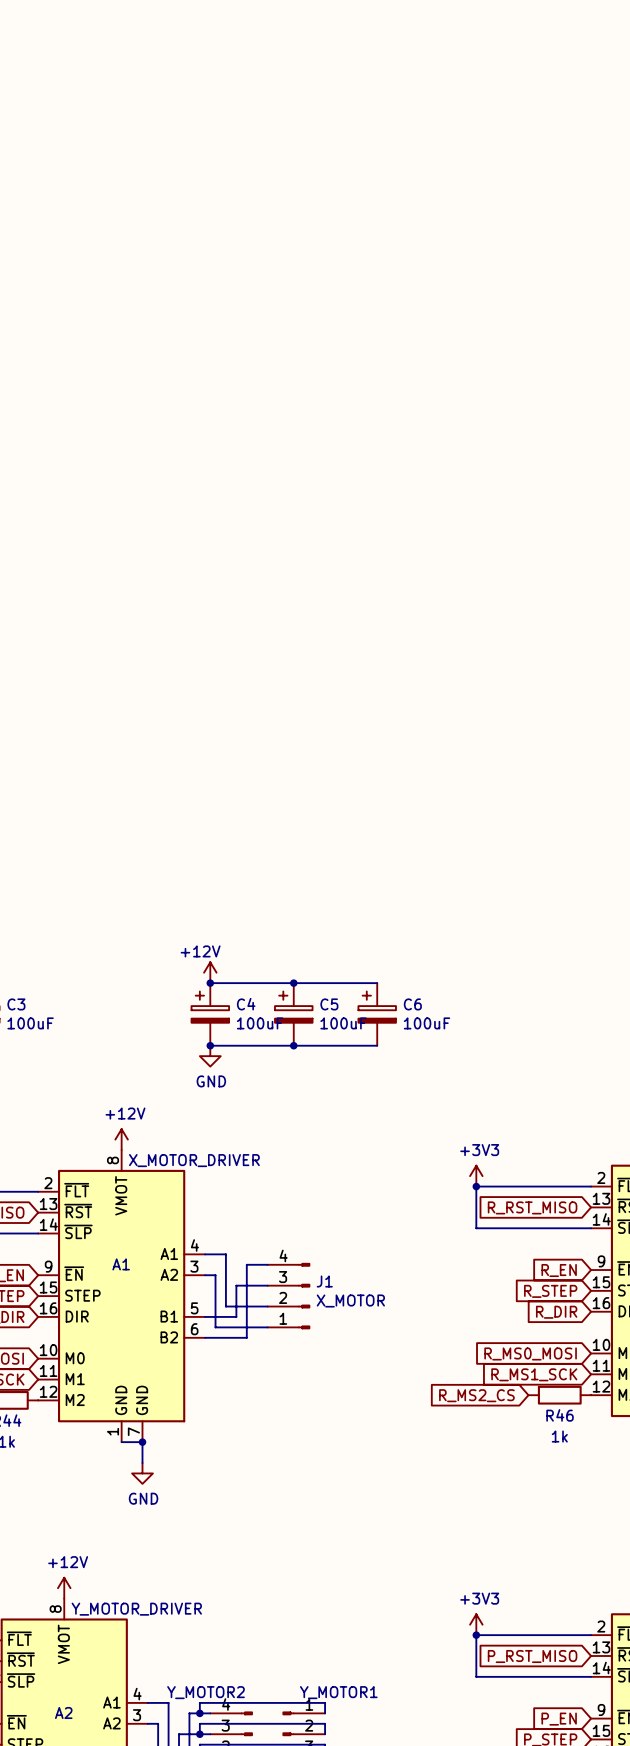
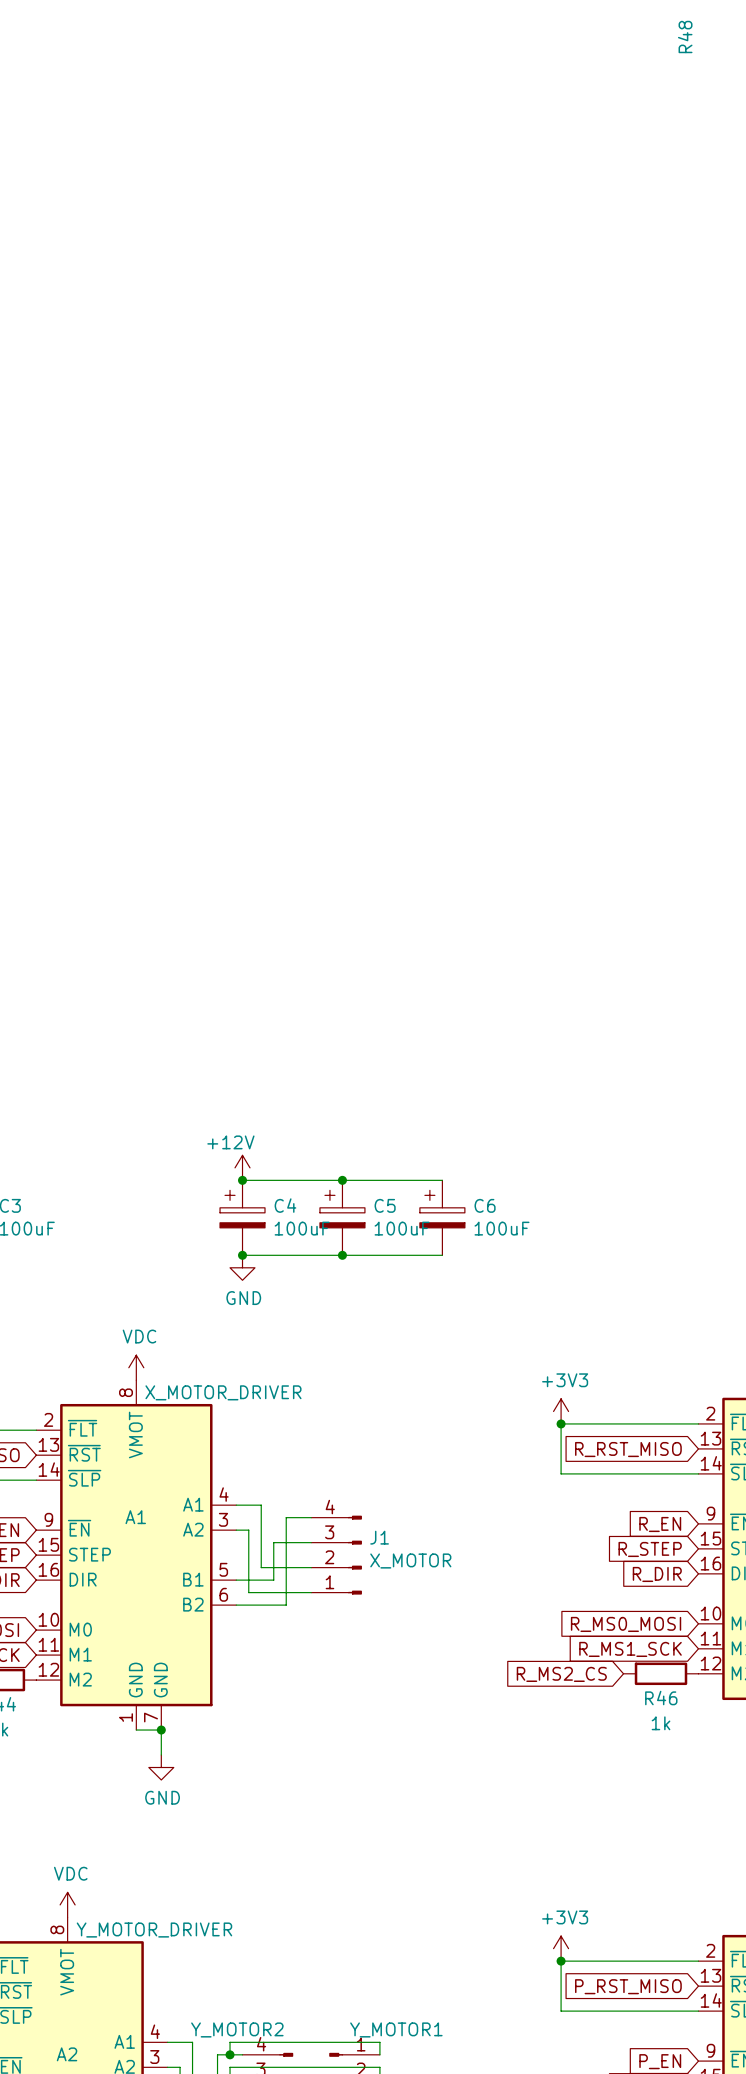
power symbol: +12V (121, 1139) -> VDC (136, 1367)
power symbol: +12V (64, 1588) -> VDC (67, 1904)

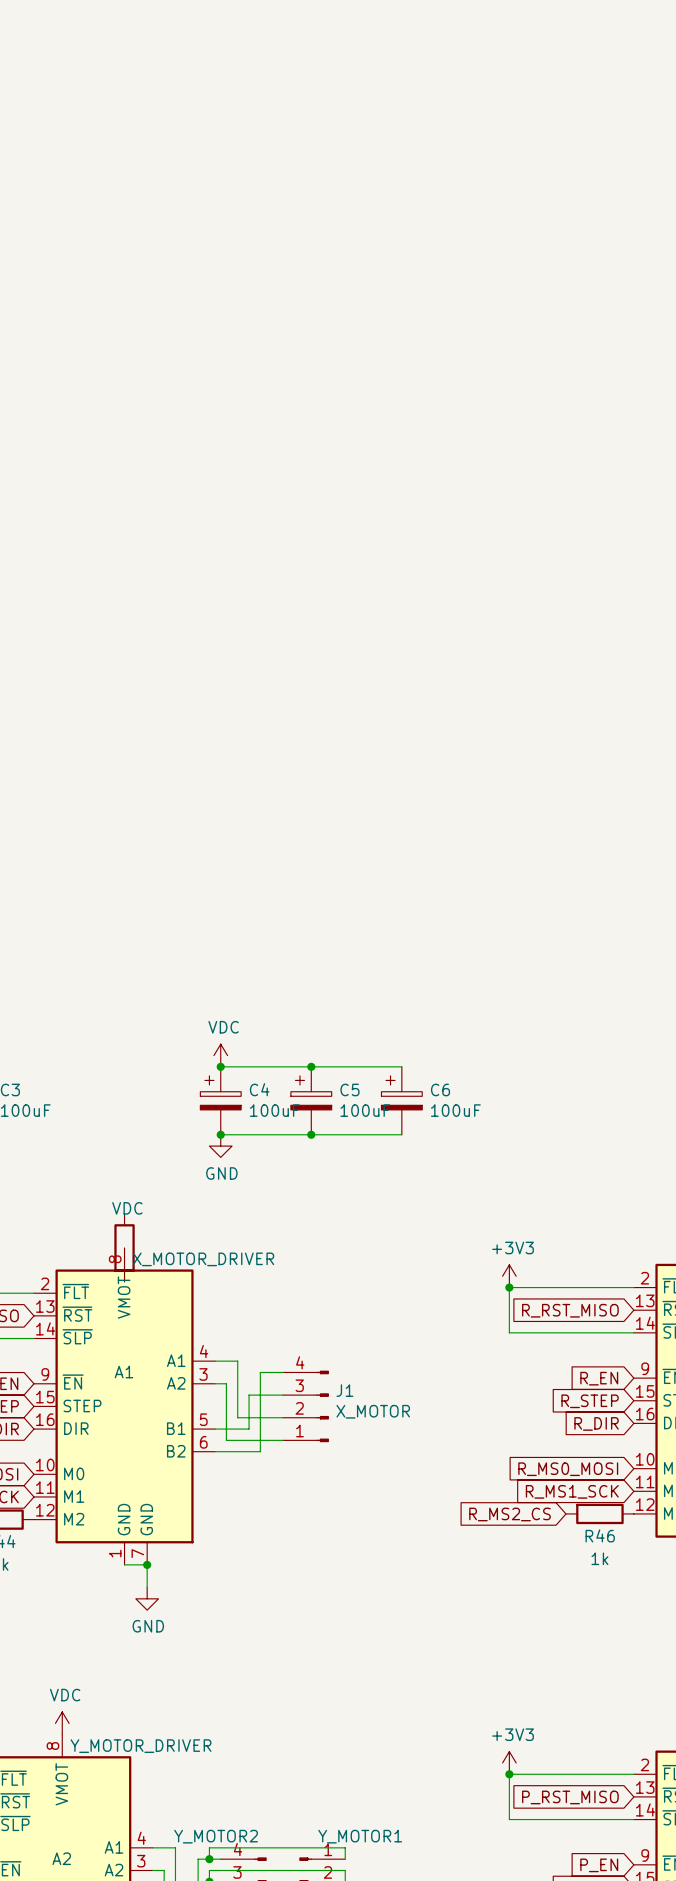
power symbol: +12V (242, 1167) -> VDC (220, 1055)
R48: VDC (136, 1367) -> none
power symbol: none -> VDC (124, 1247)

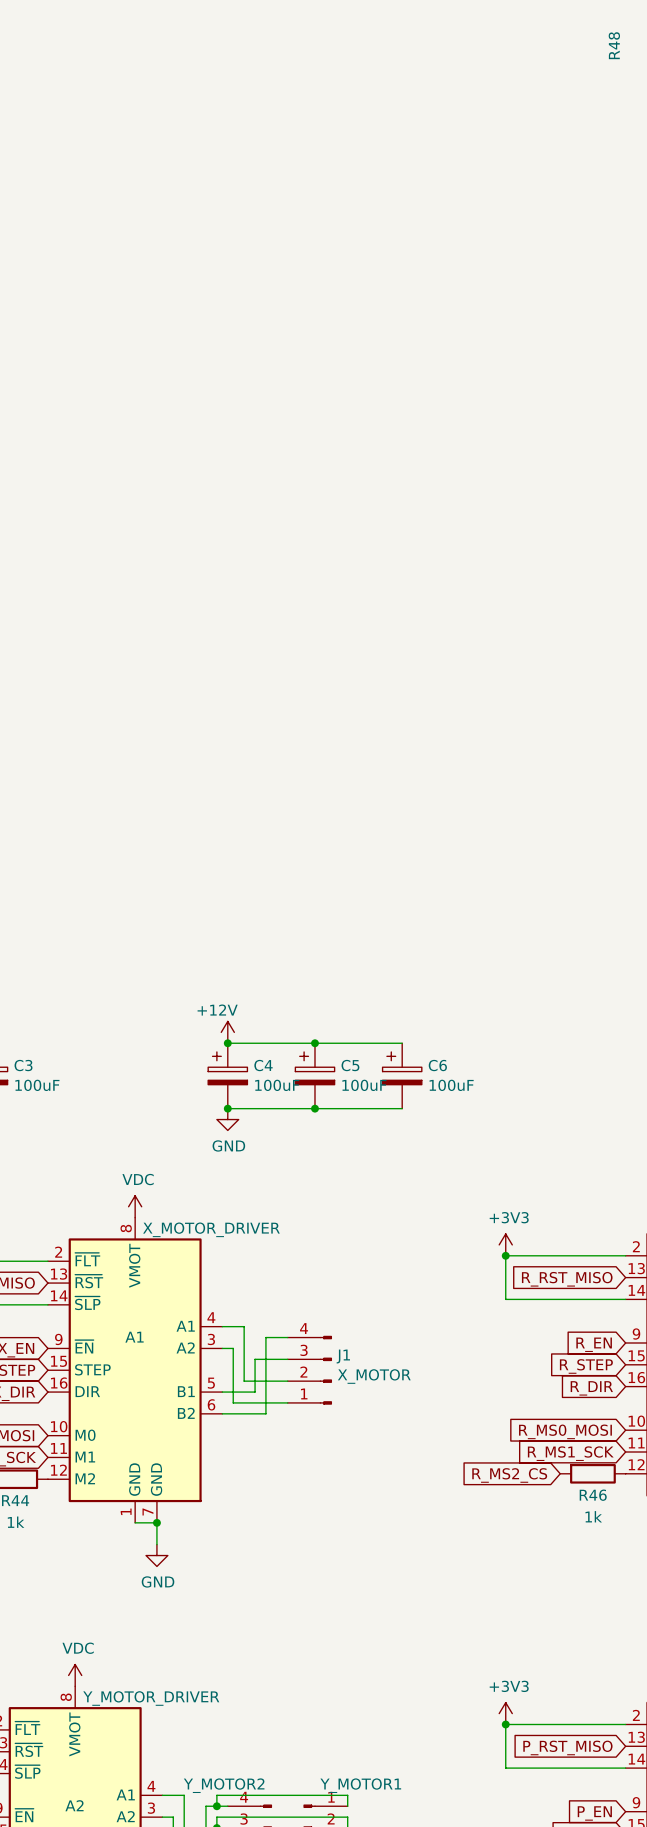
power symbol: VDC (220, 1055) -> +12V (227, 1032)
R48: none -> VDC (135, 1206)
power symbol: VDC (124, 1247) -> none

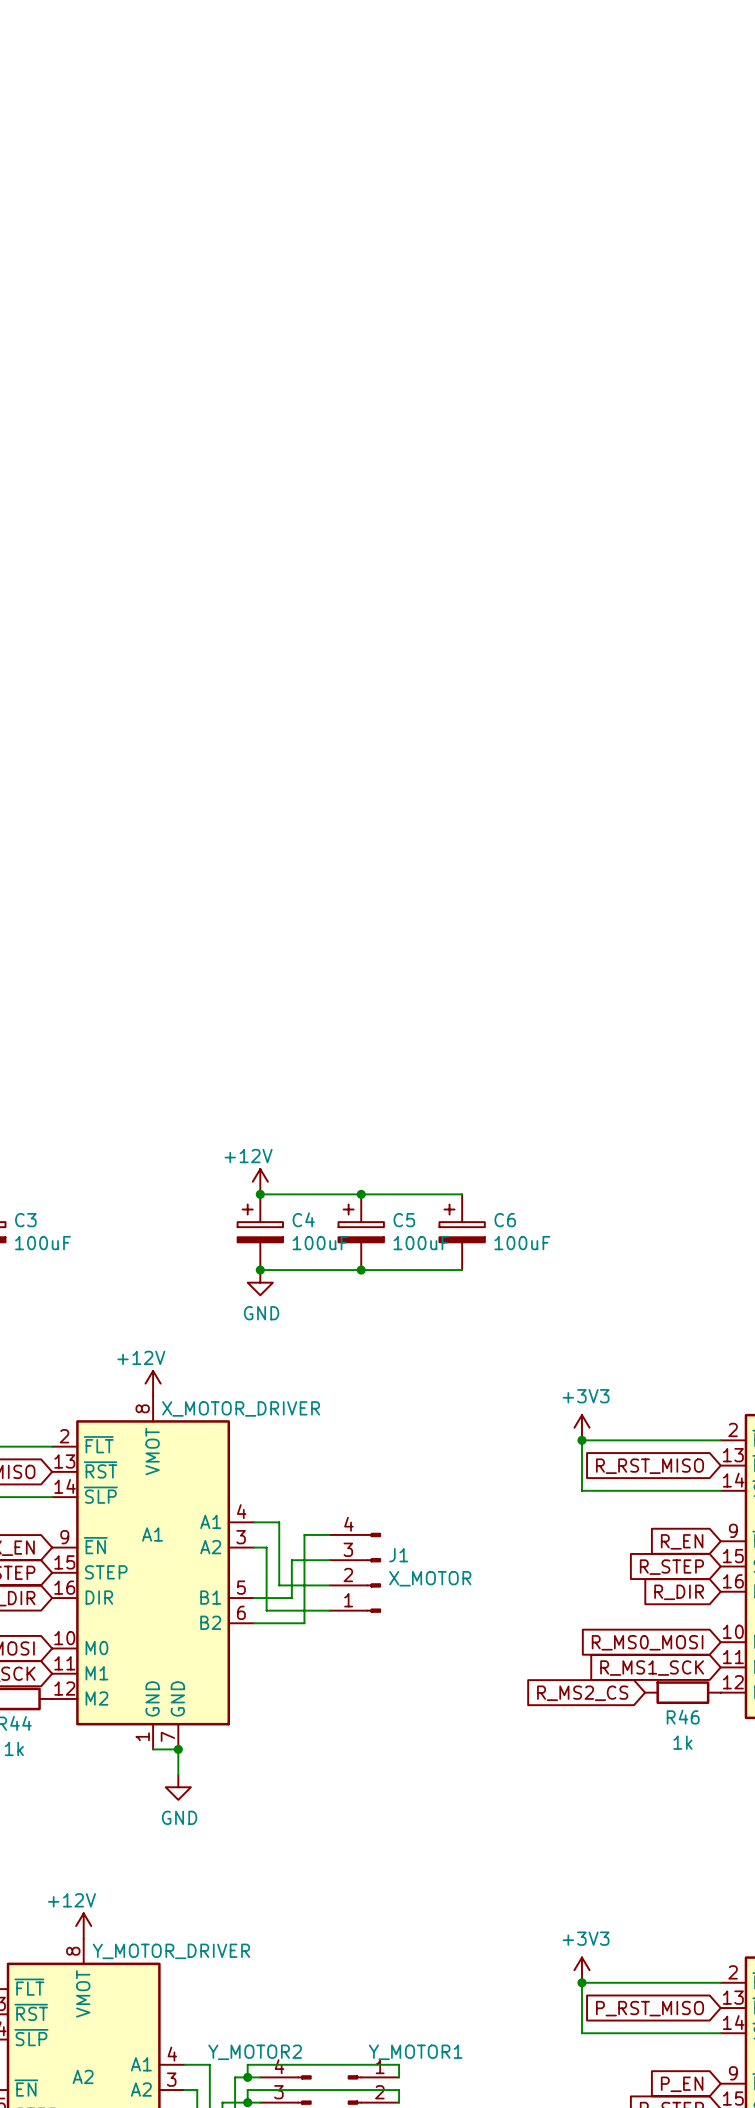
power symbol: VDC (135, 1206) -> +12V (153, 1383)
power symbol: VDC (75, 1675) -> +12V (83, 1926)

